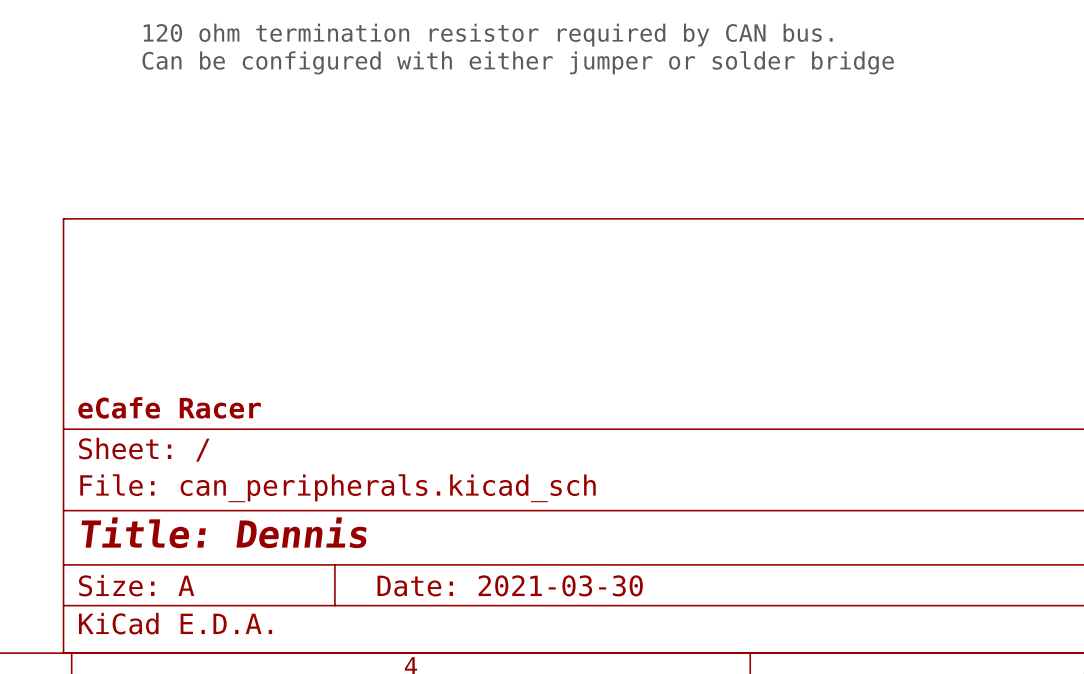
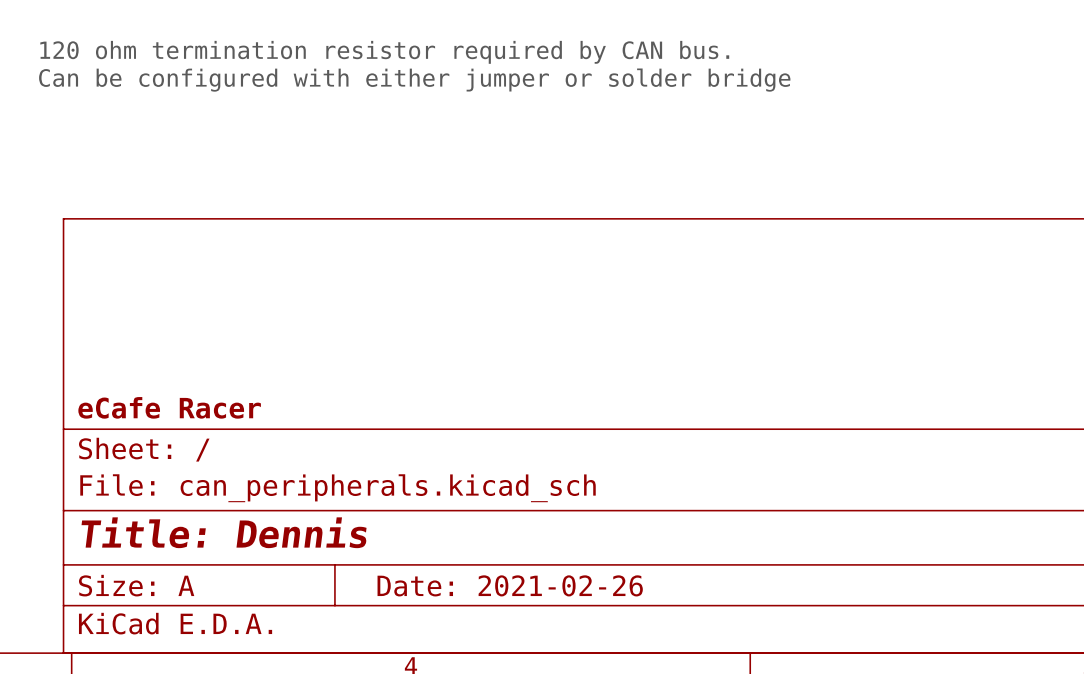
text position: 120 ohm termination resistor required by CAN bus. (488, 35) -> 120 ohm termination resistor required by CAN bus. (384, 52)
text position: Can be configured with either jumper or solder bridge (518, 62) -> Can be configured with either jumper or solder bridge (414, 80)
title block: Date: 2021-03-30 (510, 585) -> Date: 2021-02-26 (510, 585)

